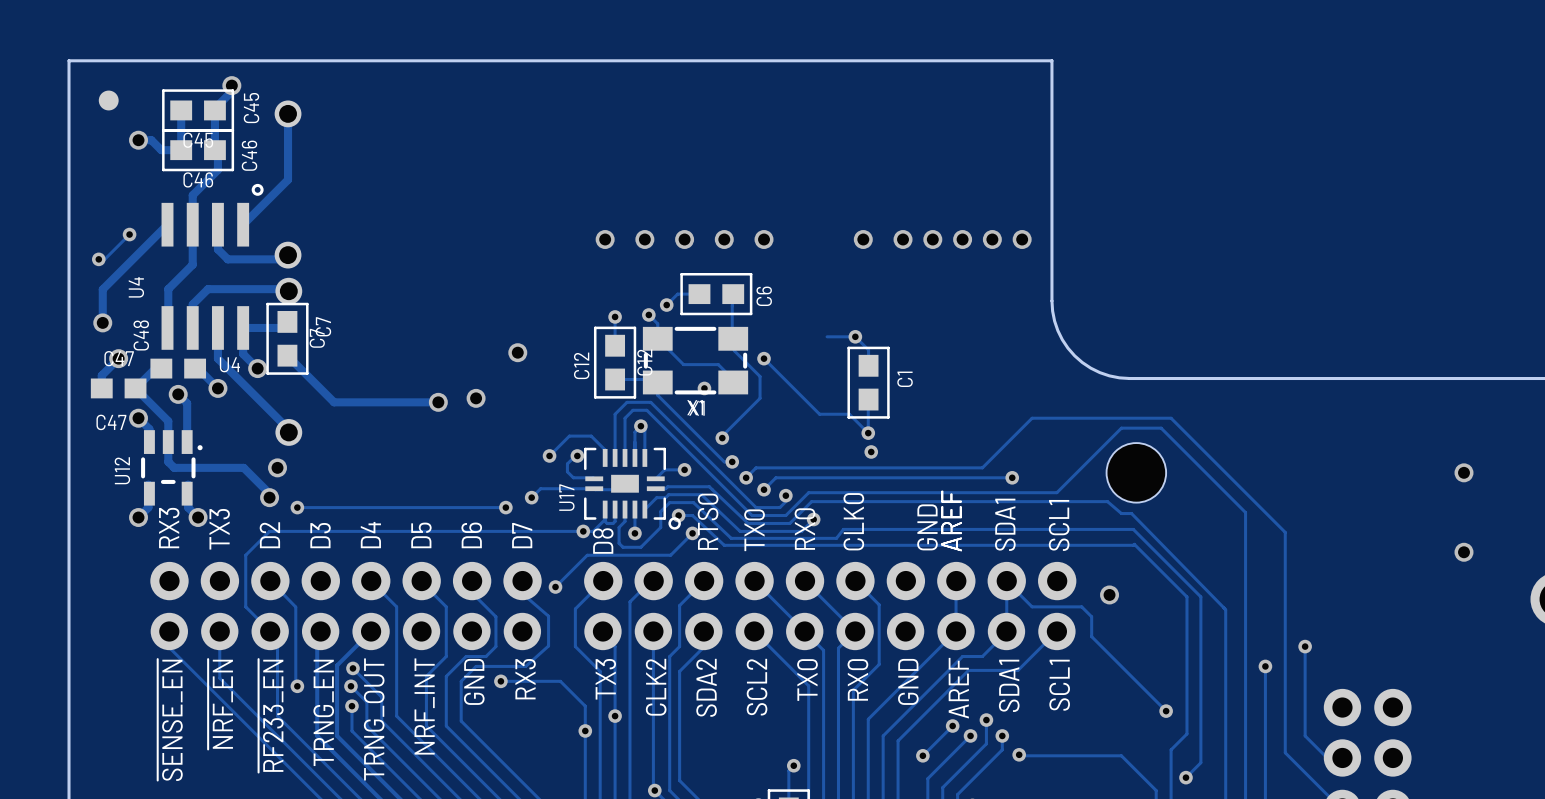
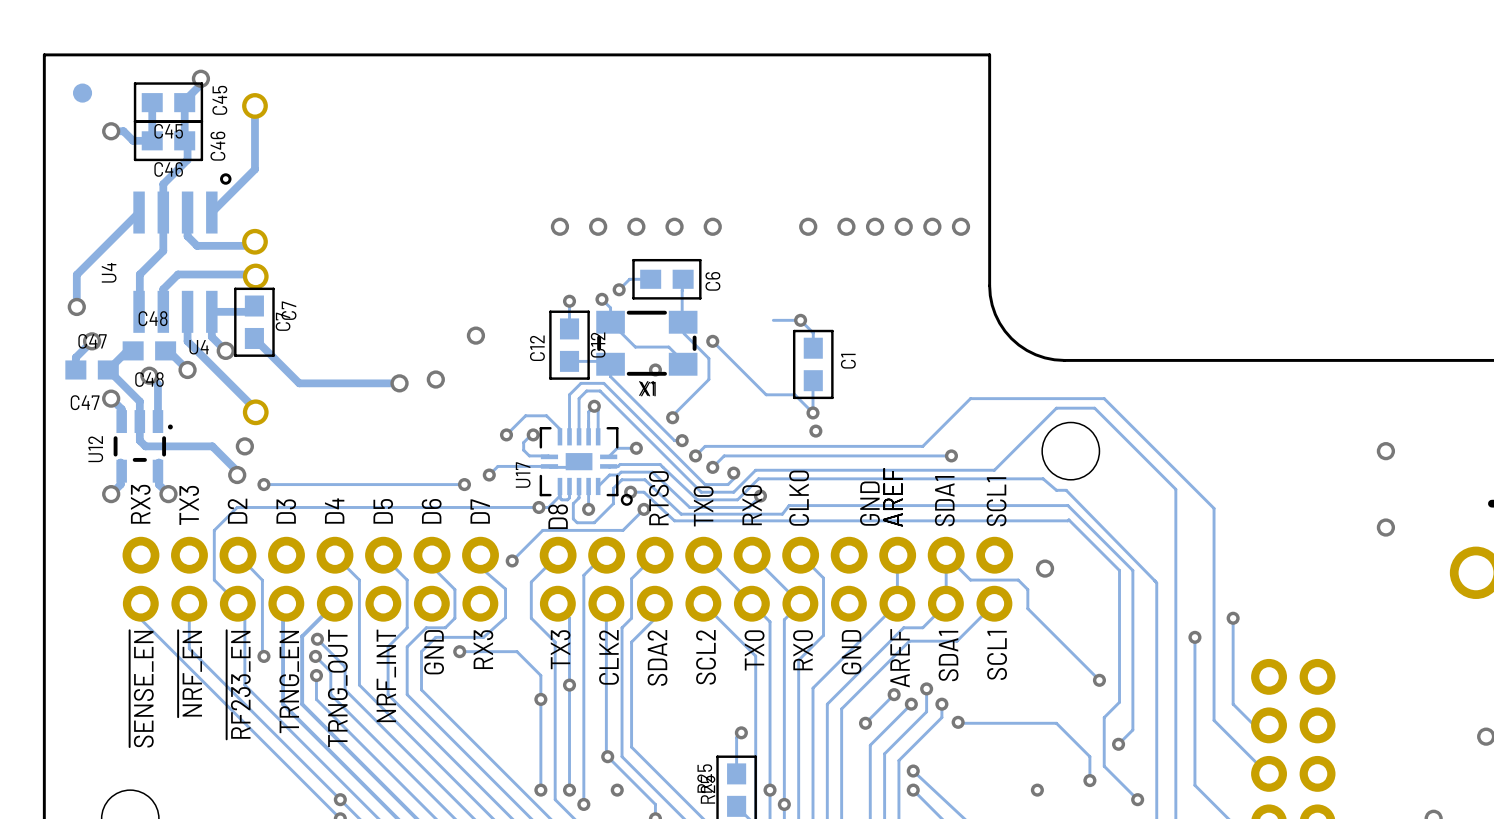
track: (129, 234) (104, 259) (98, 259) -> none
via: (129, 234) -> none
via: (98, 259) -> none
text rotation: 0° (141, 335) -> 90° clockwise (153, 318)
C48 name: none -> C48 (149, 379)

